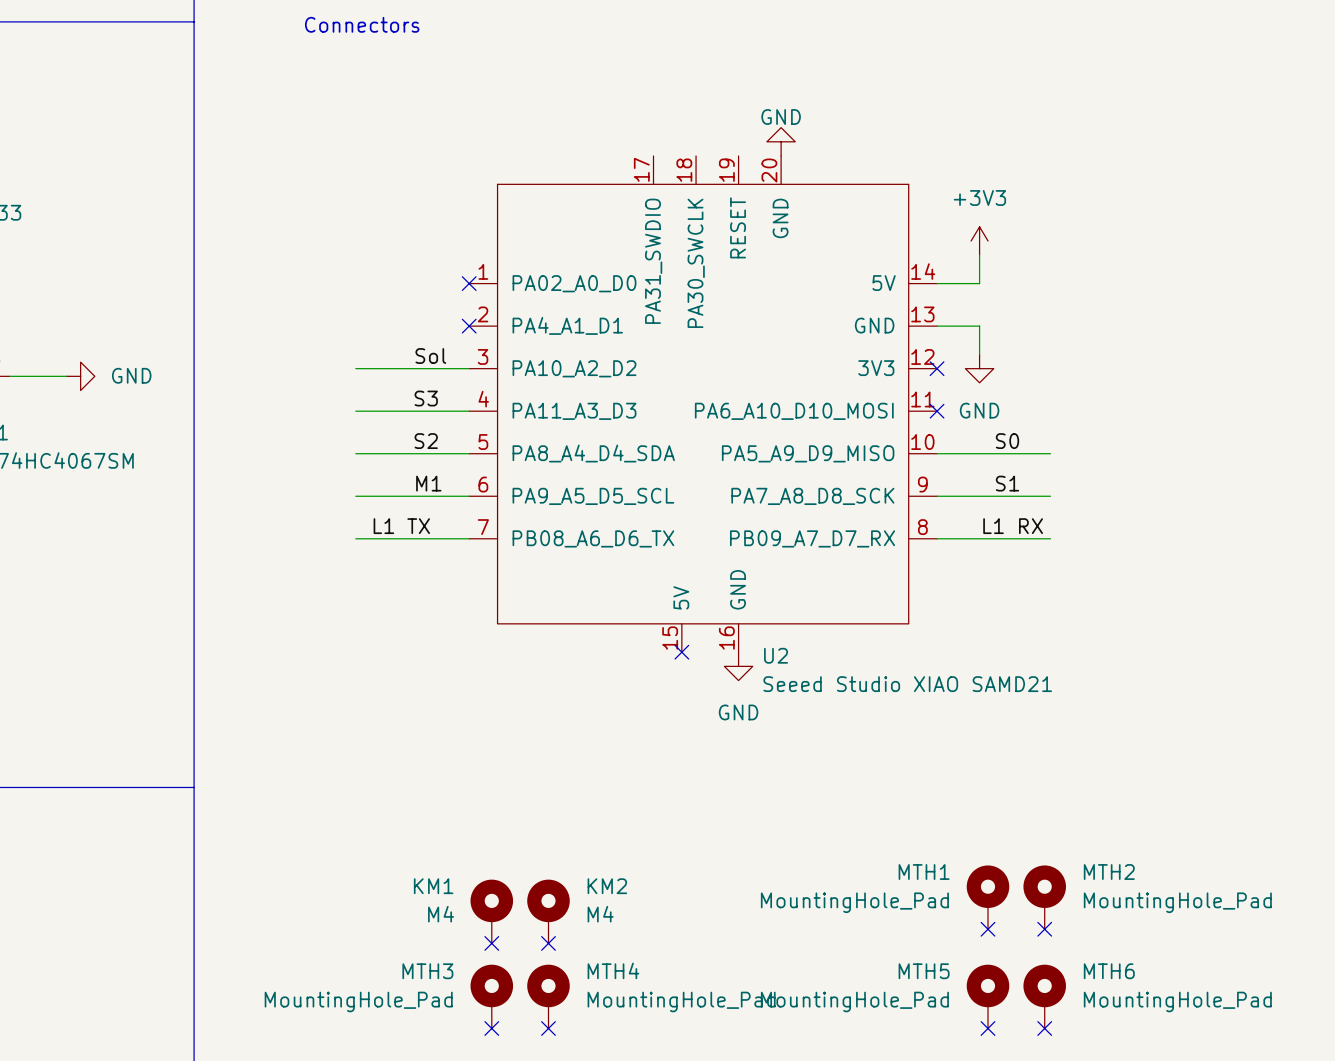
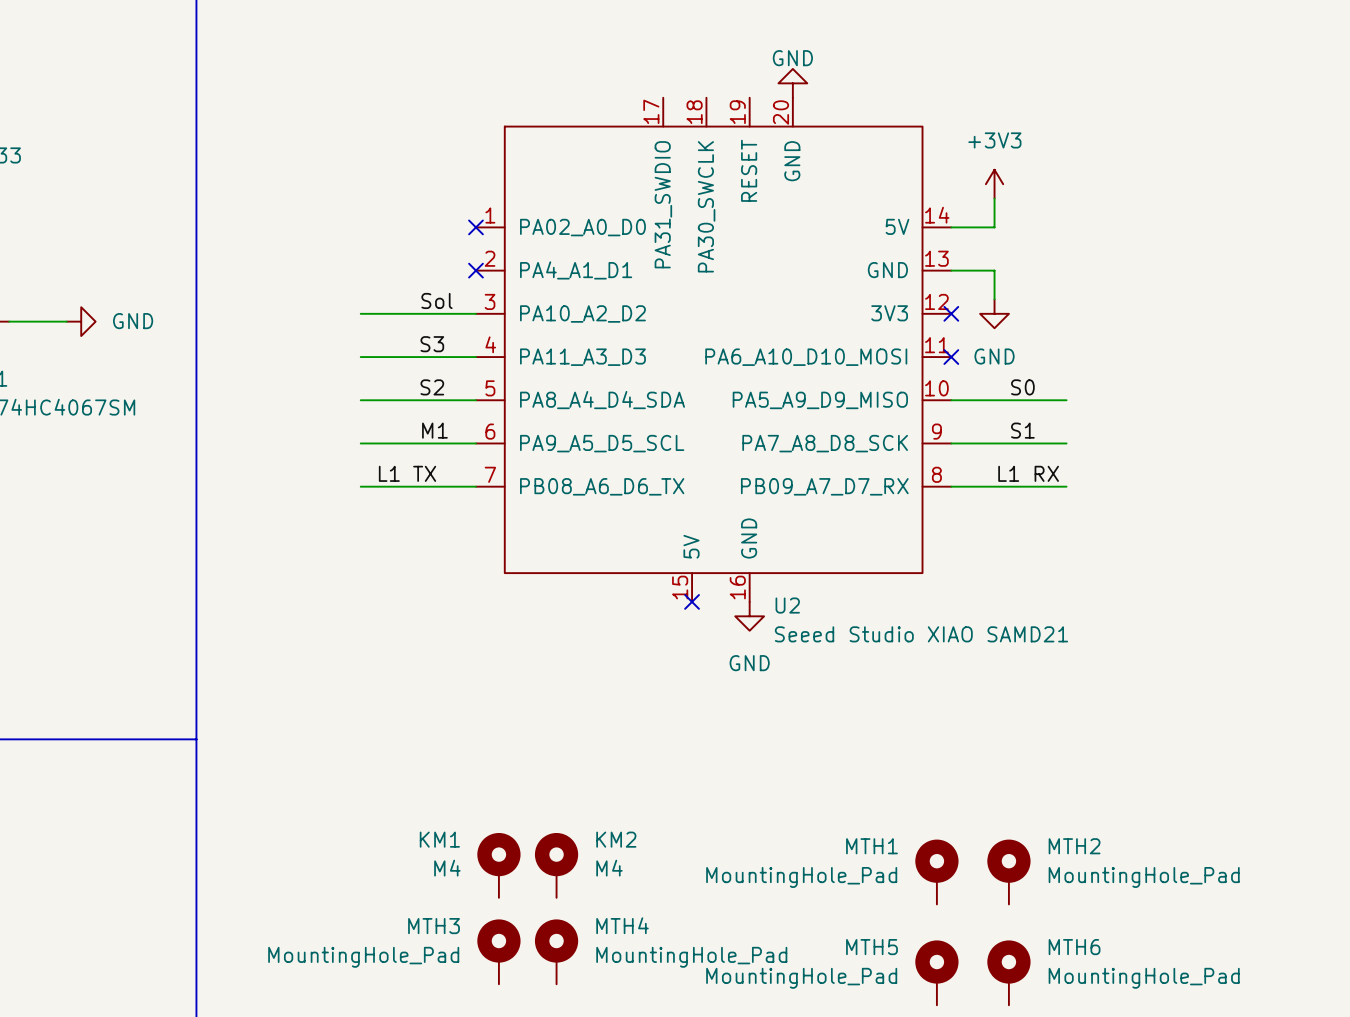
MTH1 position: (988, 897) -> (936, 872)
MTH2 position: (1044, 897) -> (1008, 872)
no-connect mark: (988, 929) -> none
no-connect mark: (1044, 929) -> none
no-connect mark: (491, 943) -> none
no-connect mark: (548, 943) -> none
MTH5 position: (988, 996) -> (936, 972)
MTH6 position: (1044, 996) -> (1008, 972)
no-connect mark: (491, 1028) -> none
no-connect mark: (548, 1028) -> none
no-connect mark: (988, 1028) -> none
no-connect mark: (1044, 1028) -> none

